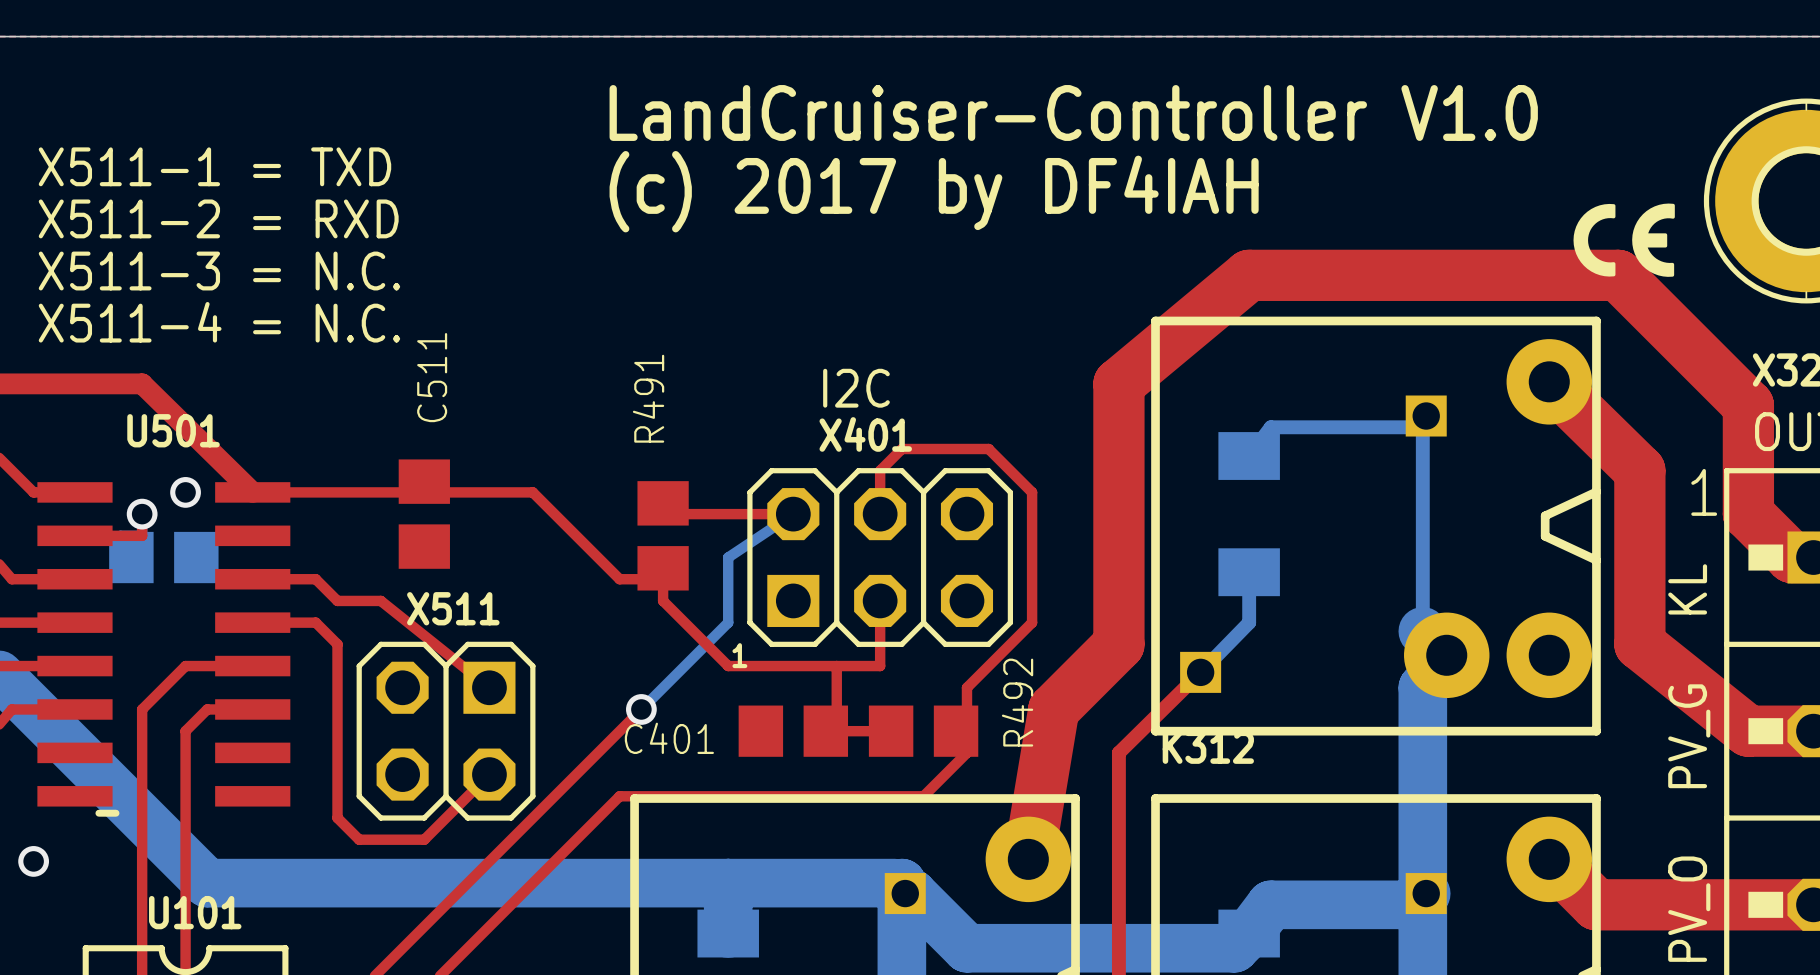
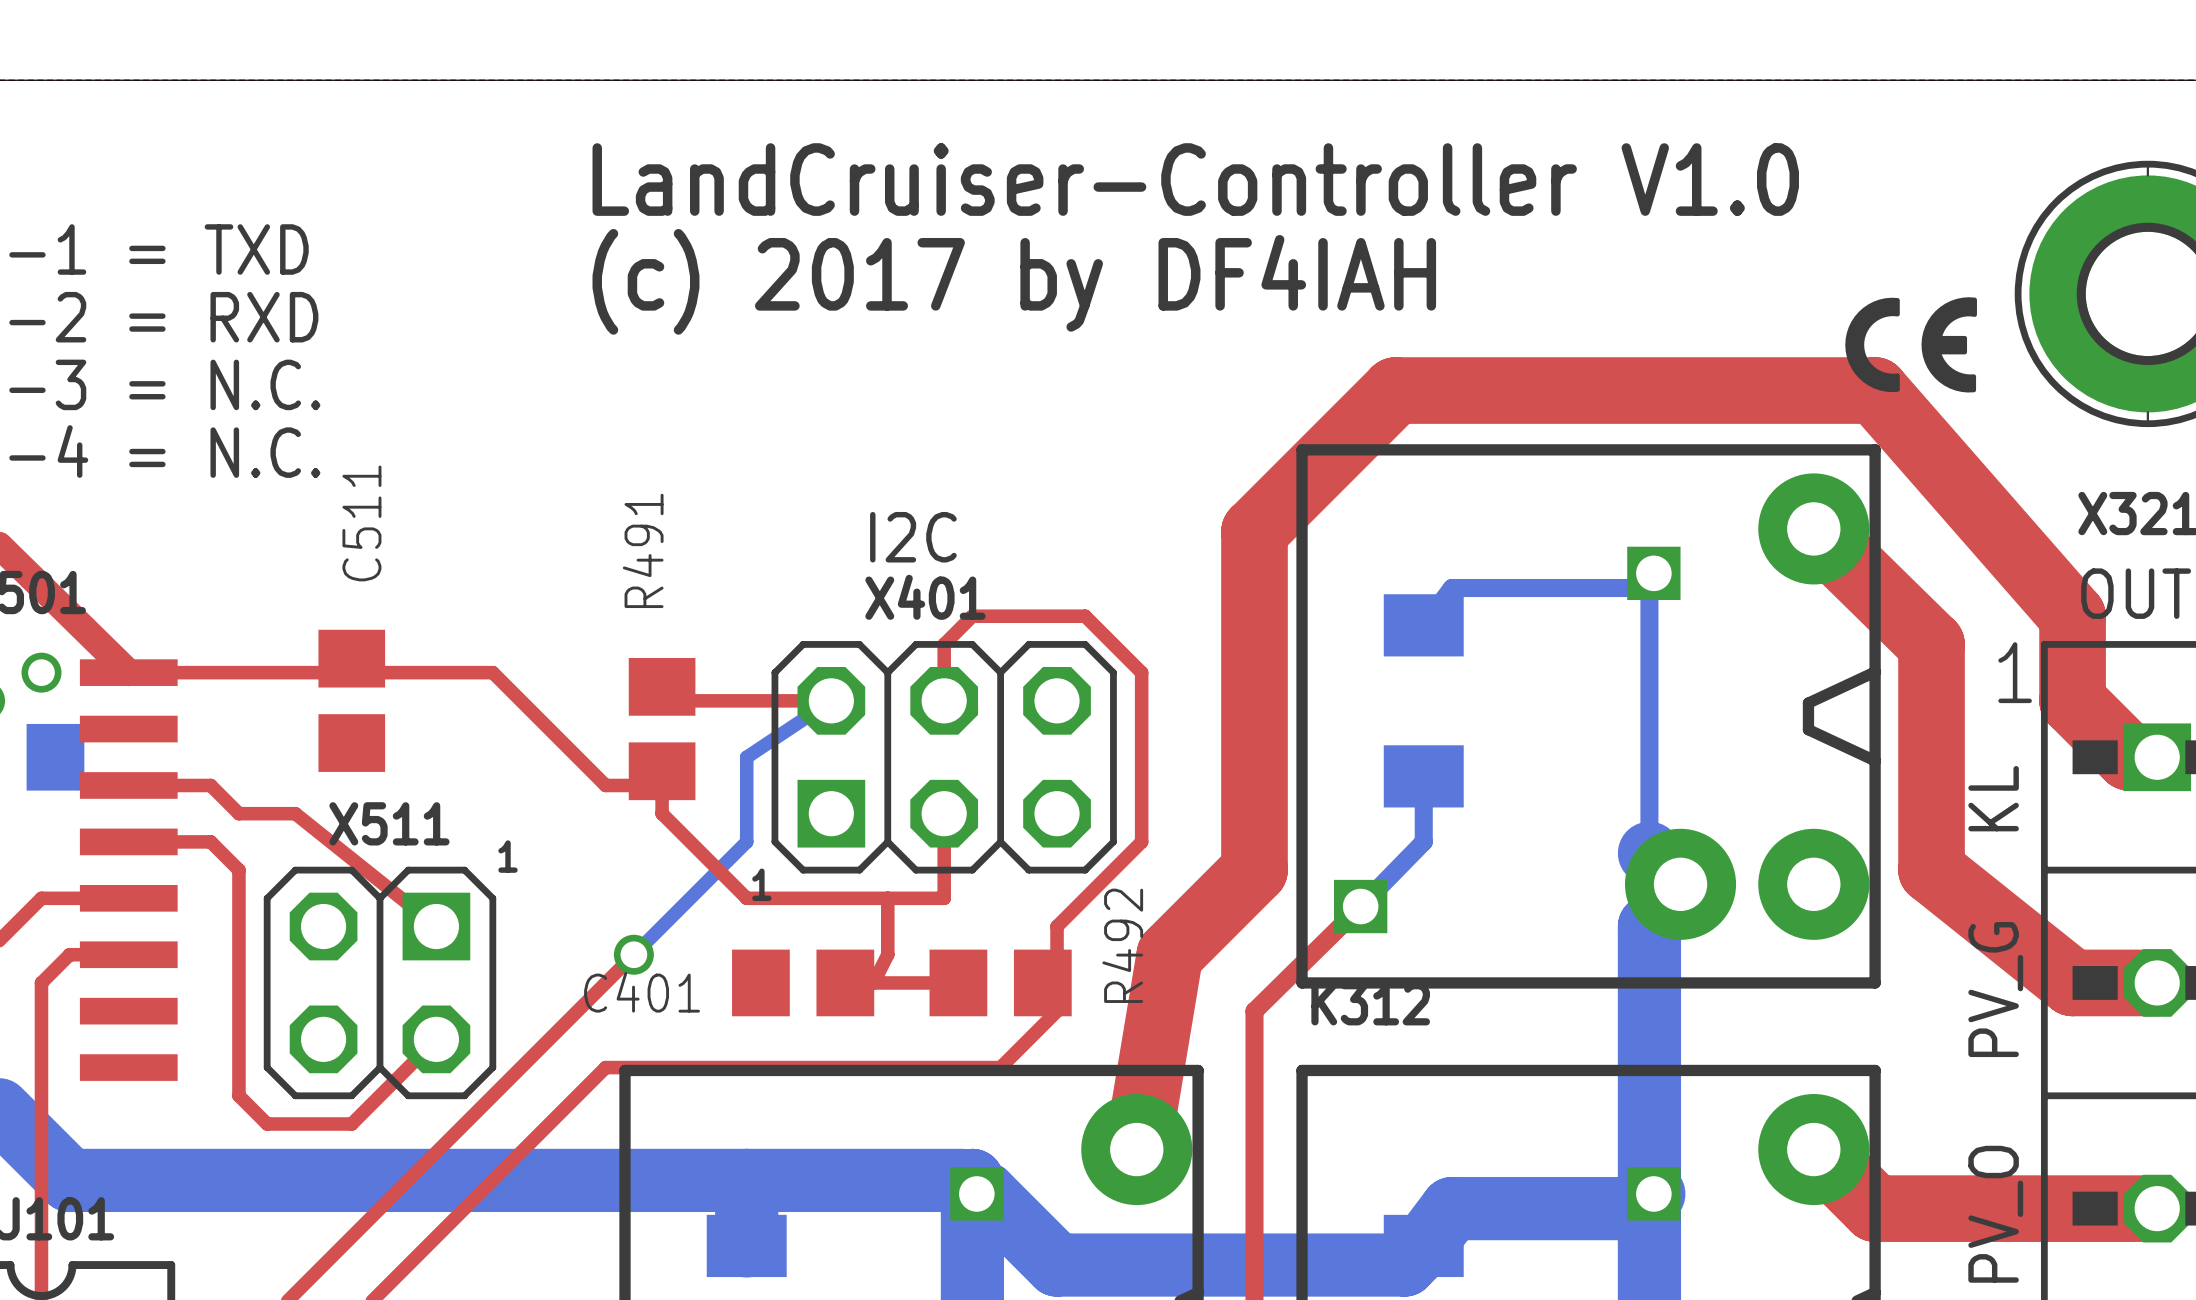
top track: (1249, 275) (1118, 383) -> (1423, 390) (1395, 390) (1254, 531)
top track: (1596, 275) (1618, 275) (1748, 405) (1748, 449) -> (1875, 390) (2072, 616)
text: none -> 1 (508, 856)
C401 position: (793, 731) -> (803, 982)

